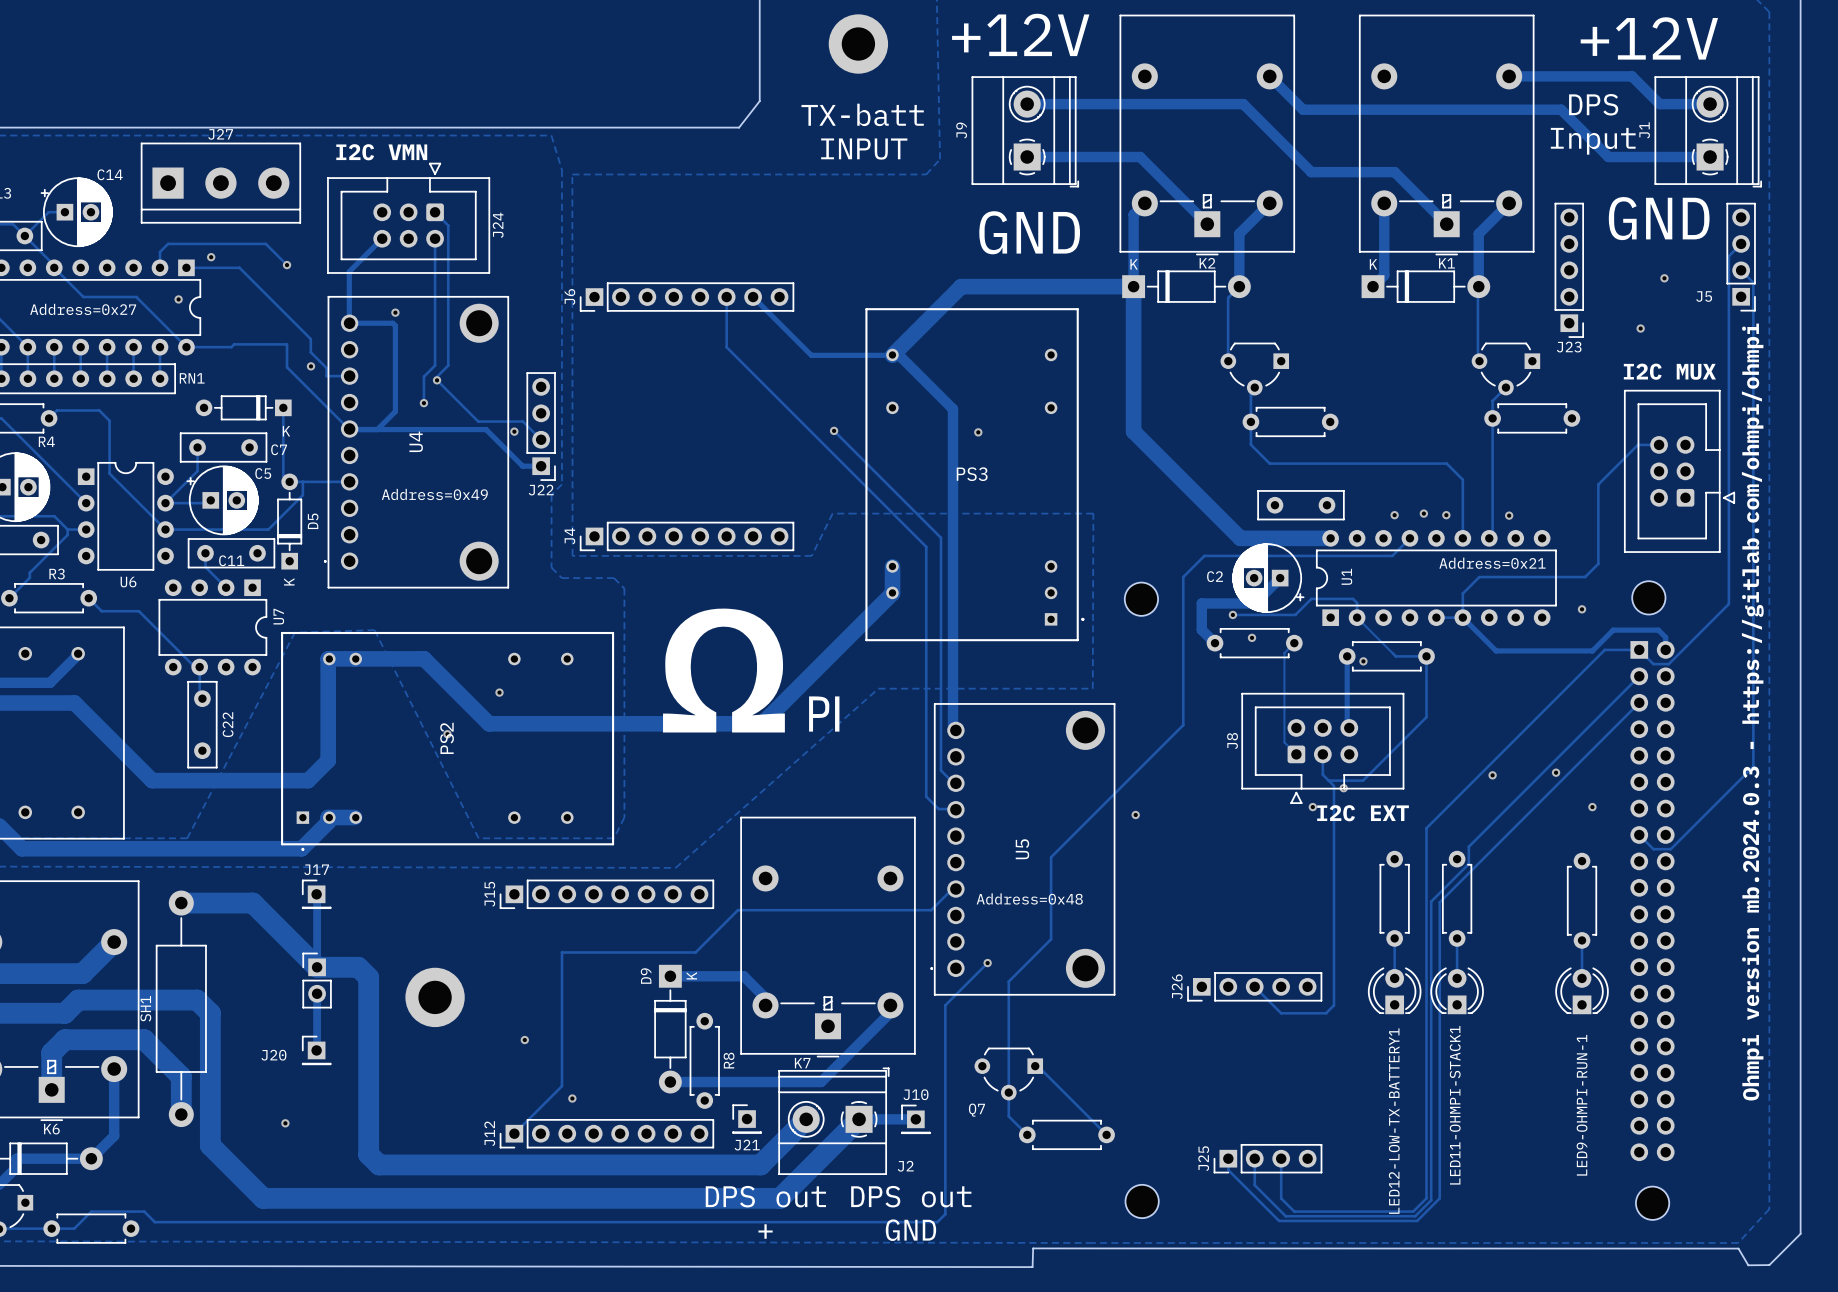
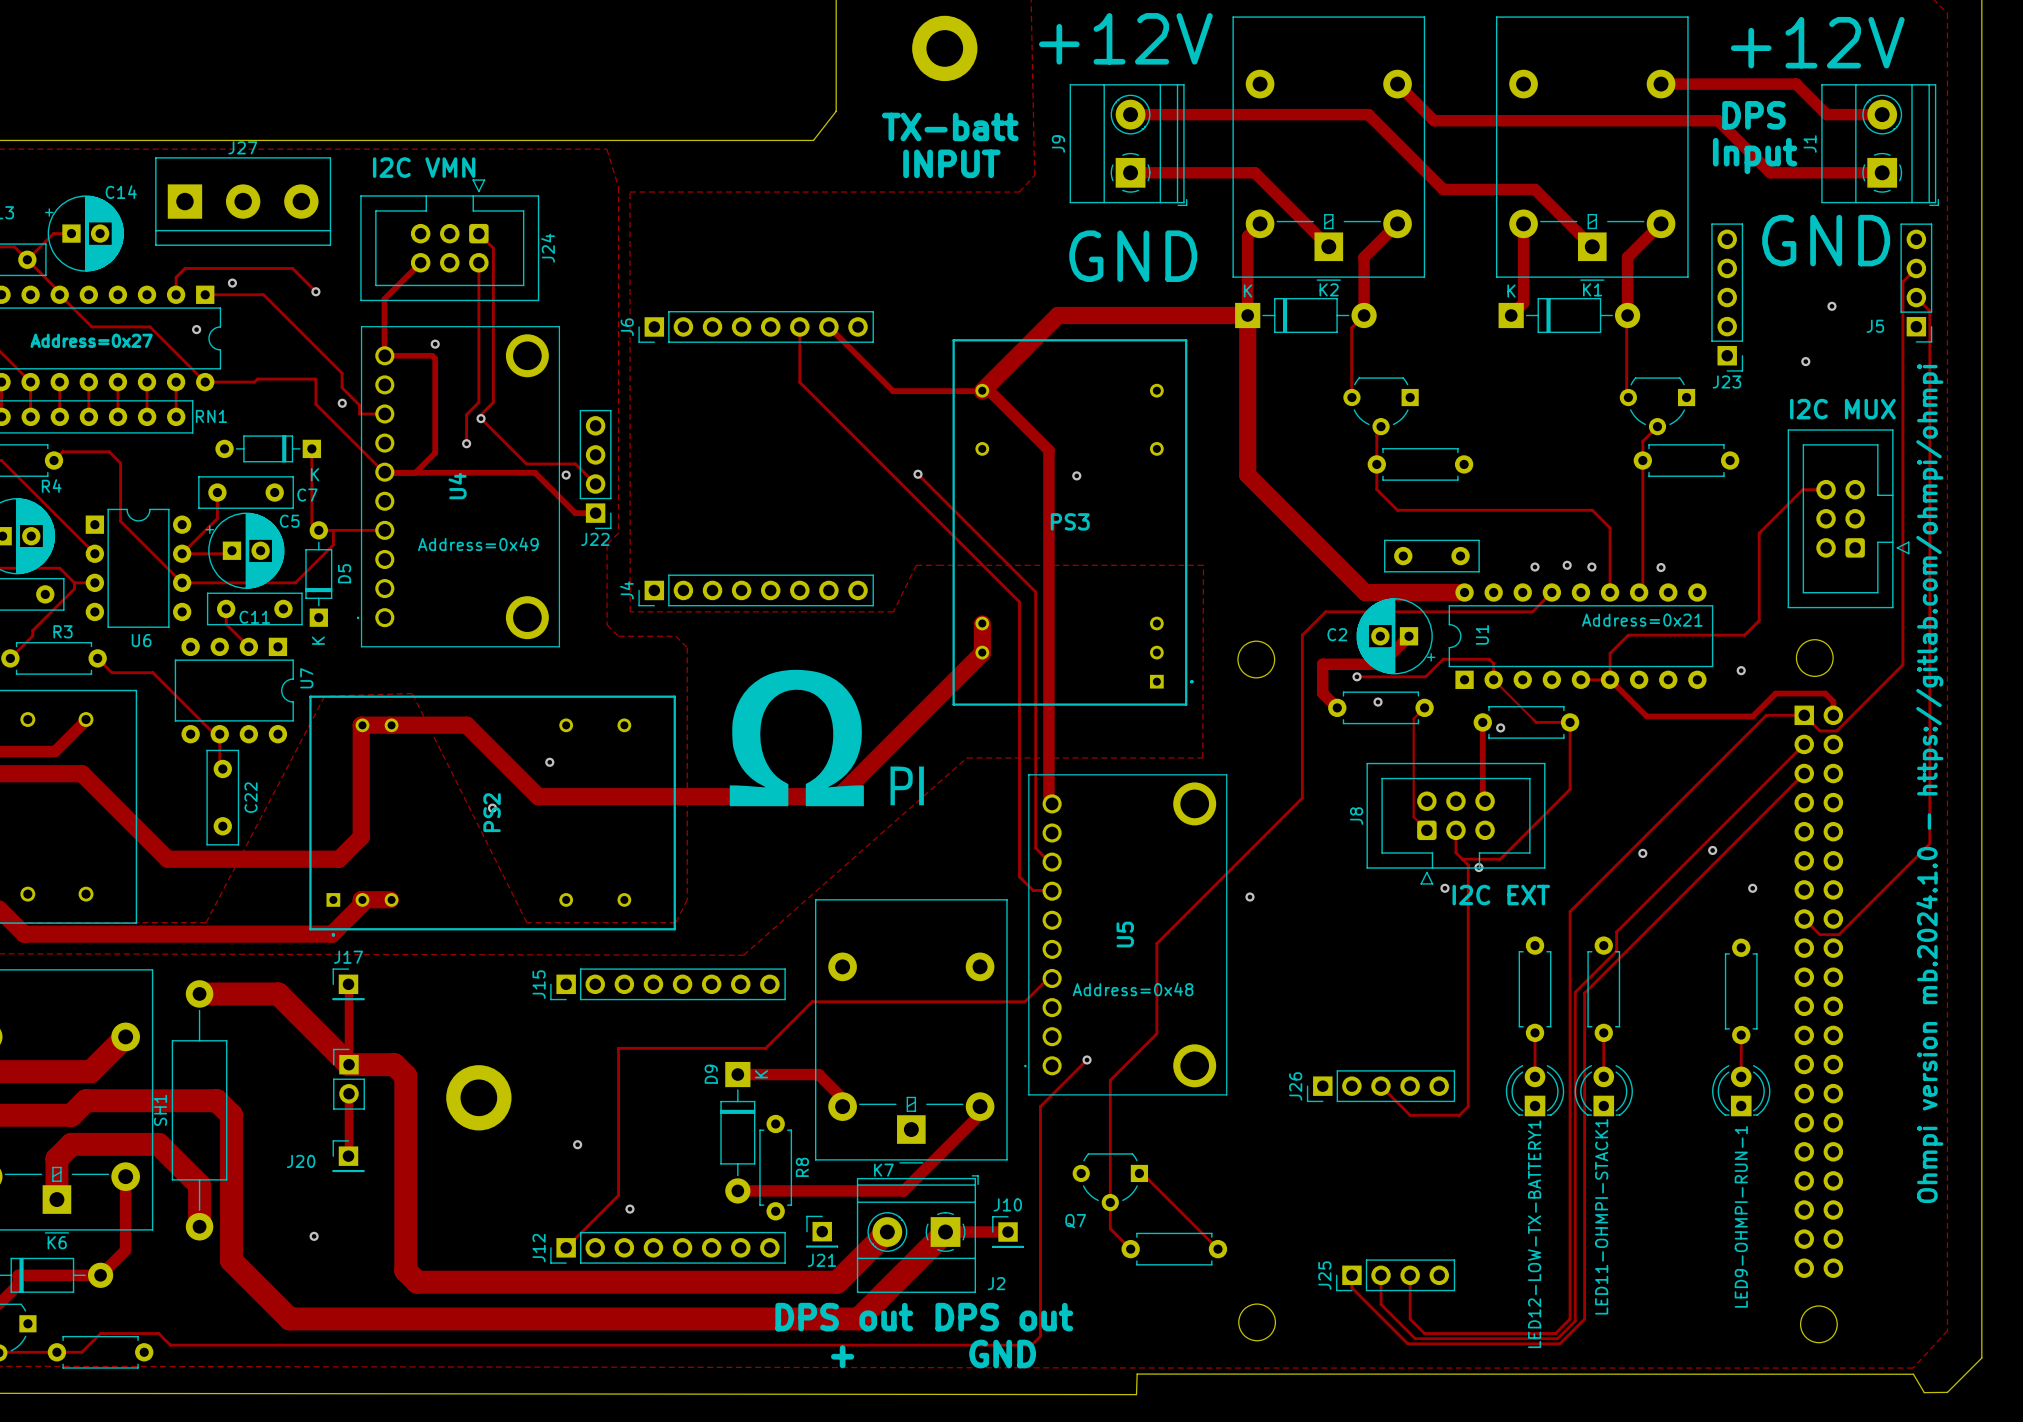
text: Ohmpi version mb.2024.0.3 - https://gitlab.com/ohmpi/ohmpi (1752, 712) -> Ohmpi version mb.2024.1.0 - https://gitlab.com/ohmpi/ohmpi (1929, 783)

